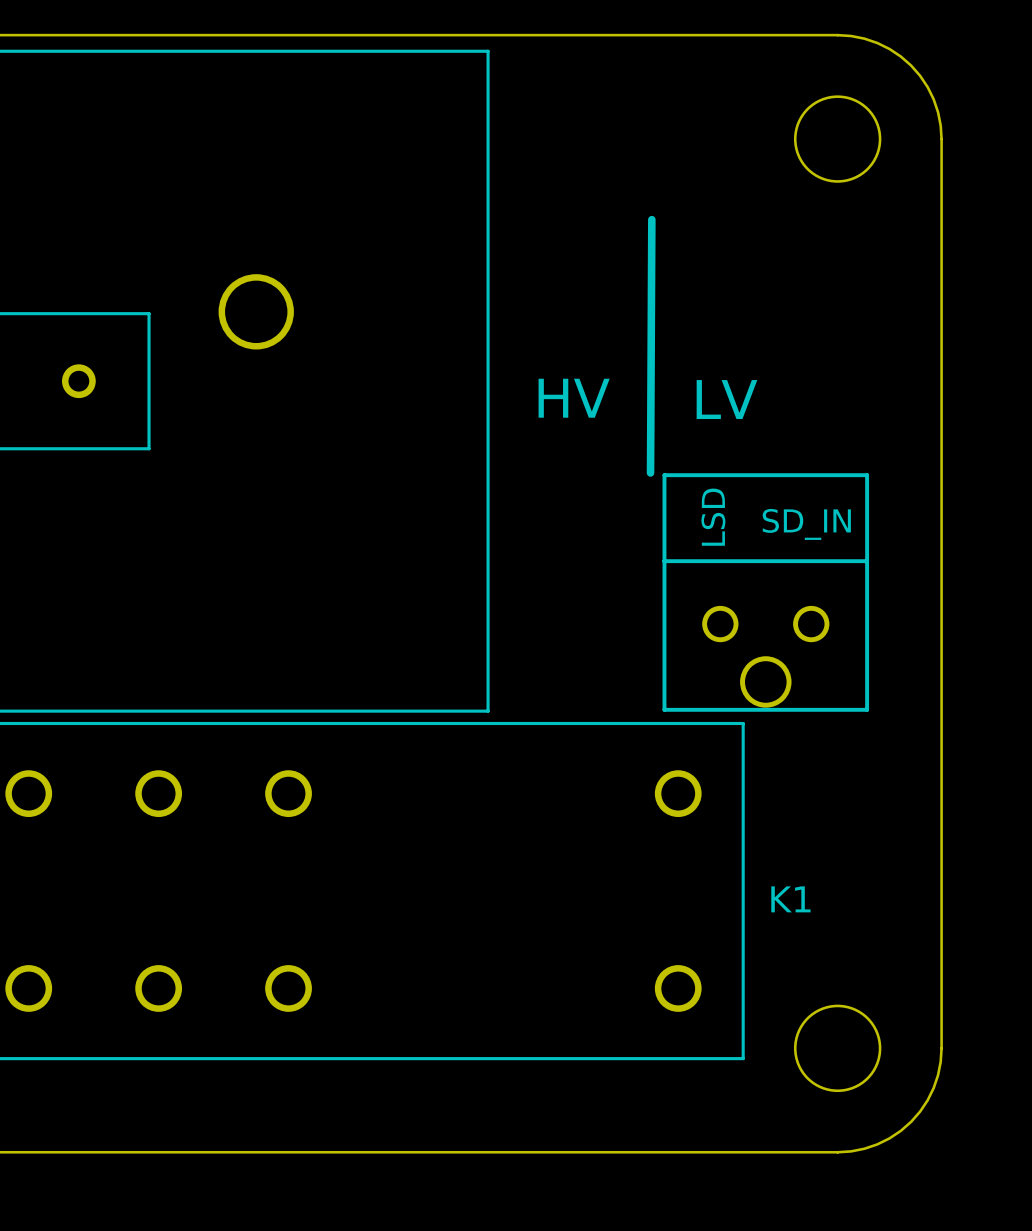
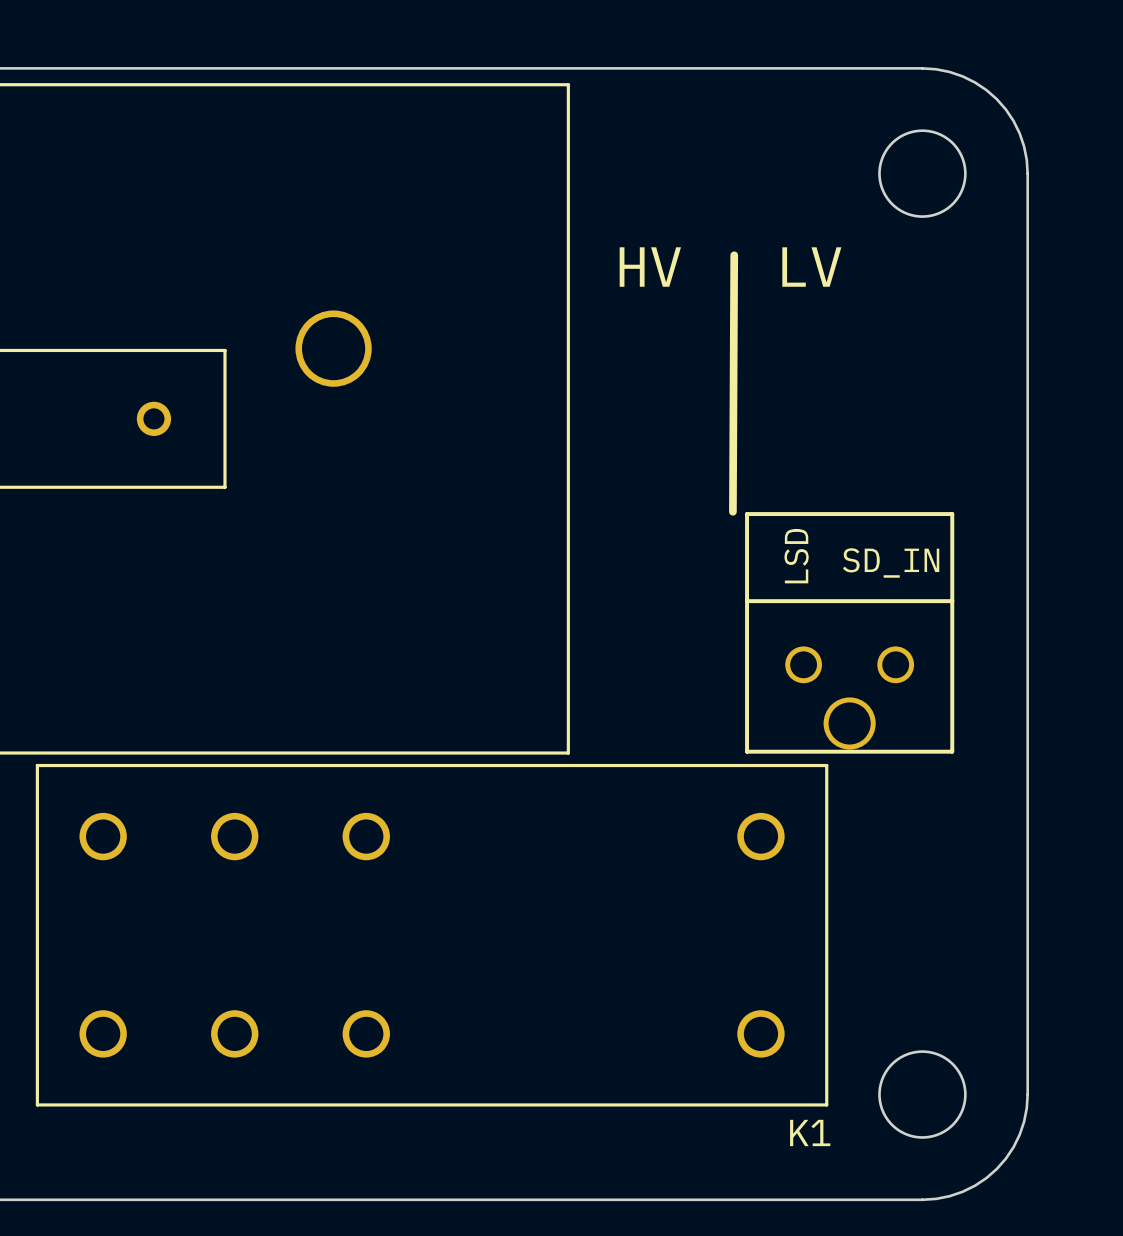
text position: HV (574, 398) -> HV (650, 267)
text position: LV (726, 399) -> LV (811, 267)
K1 name position: K1 (790, 899) -> K1 (810, 1132)

